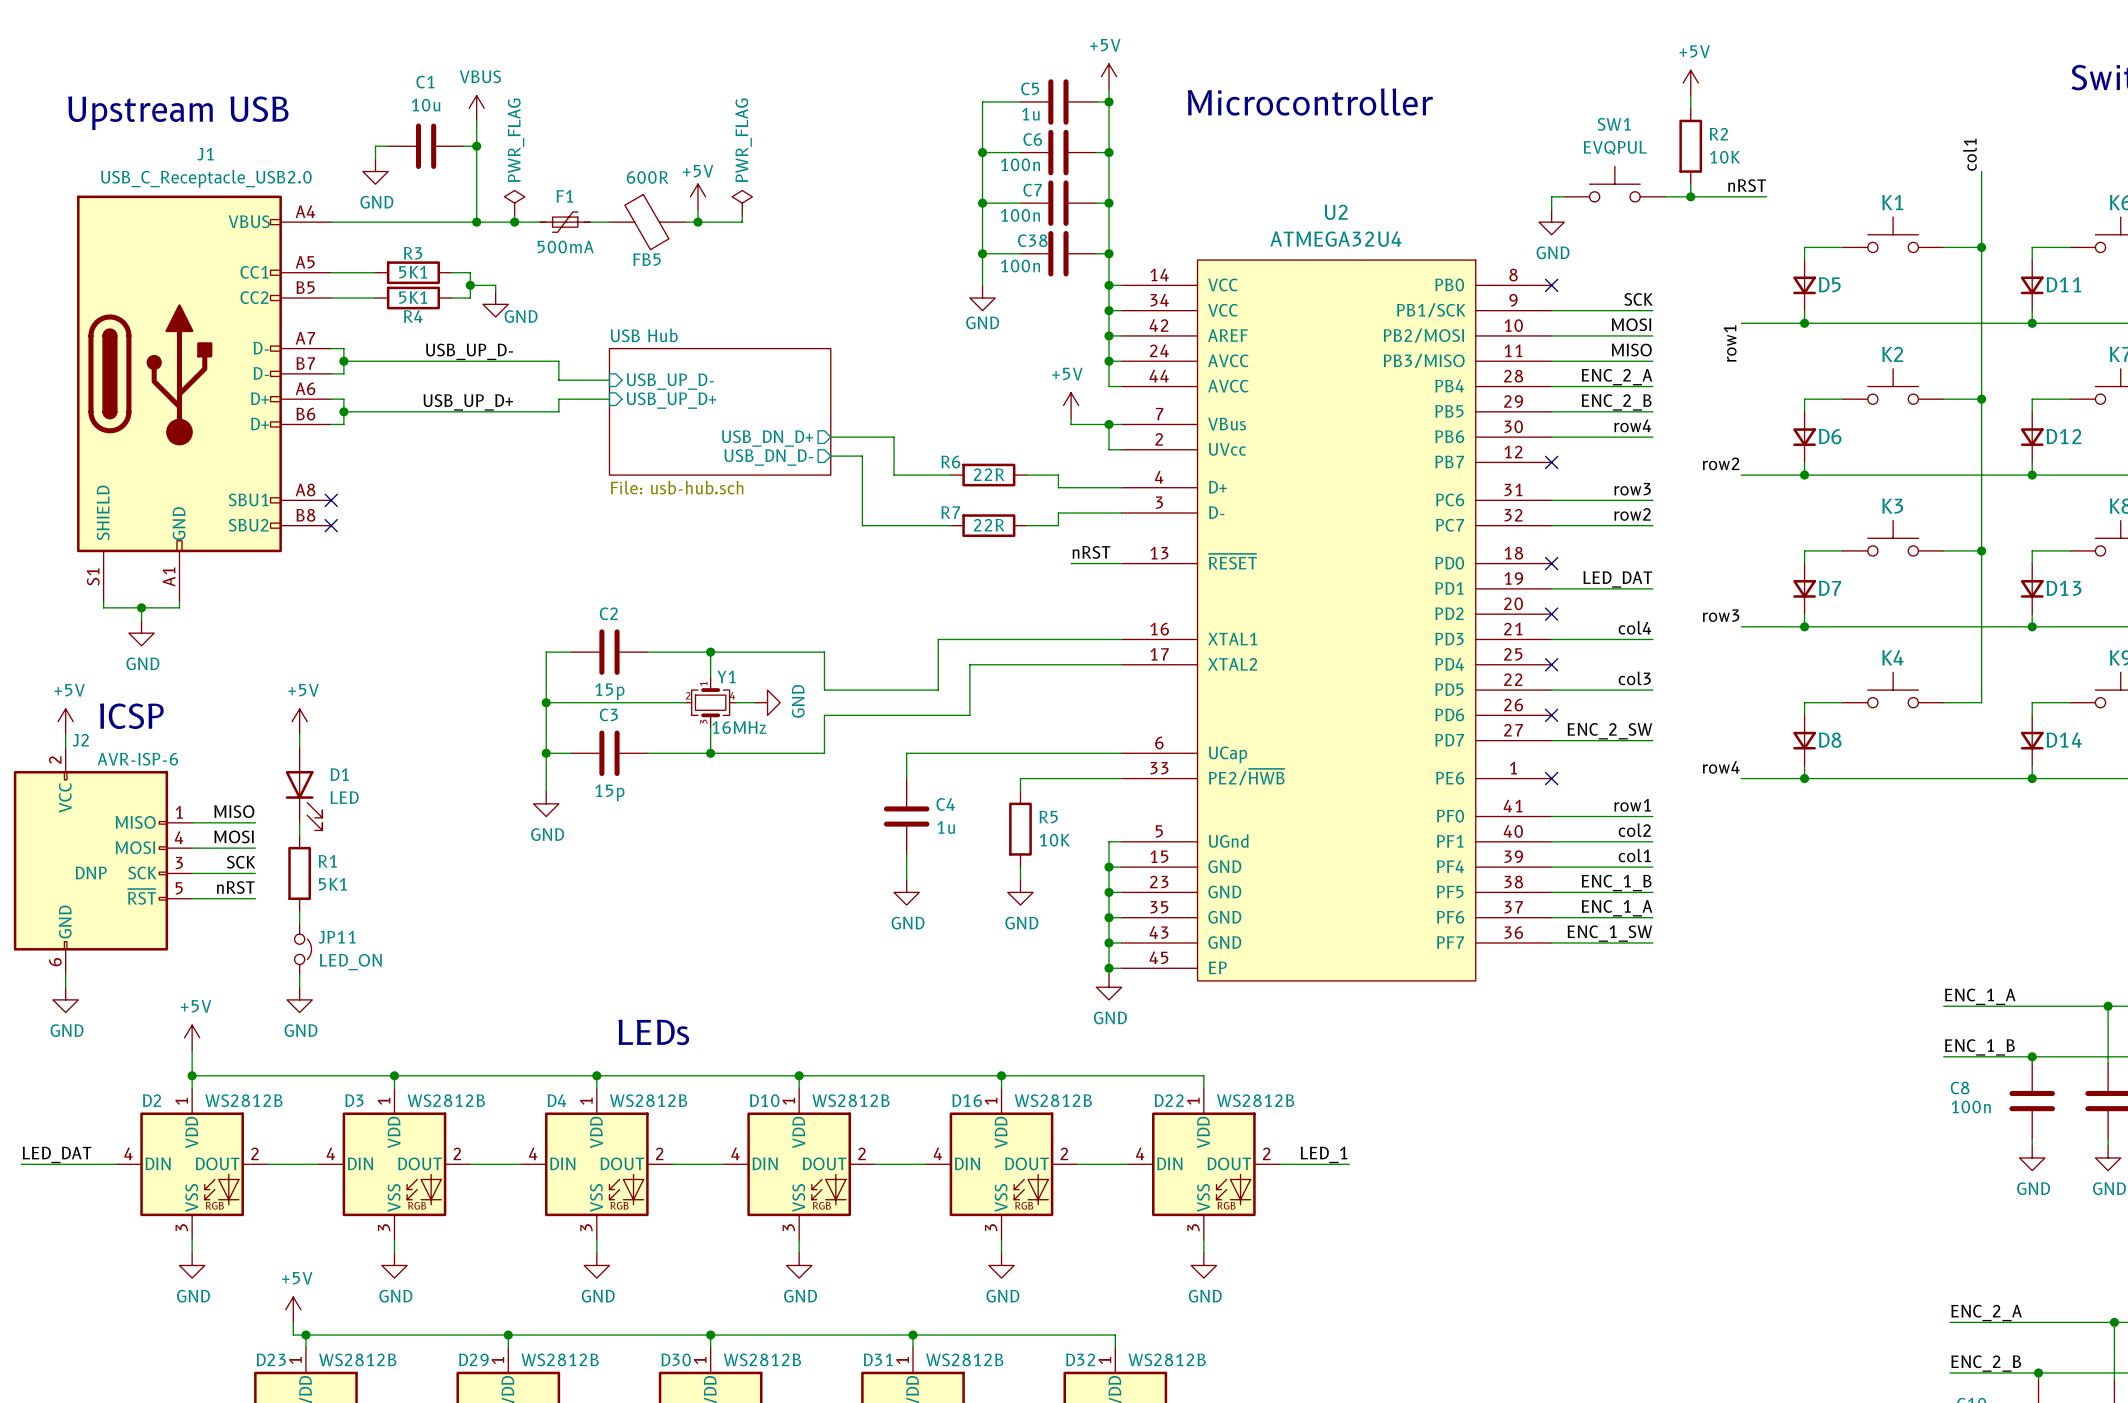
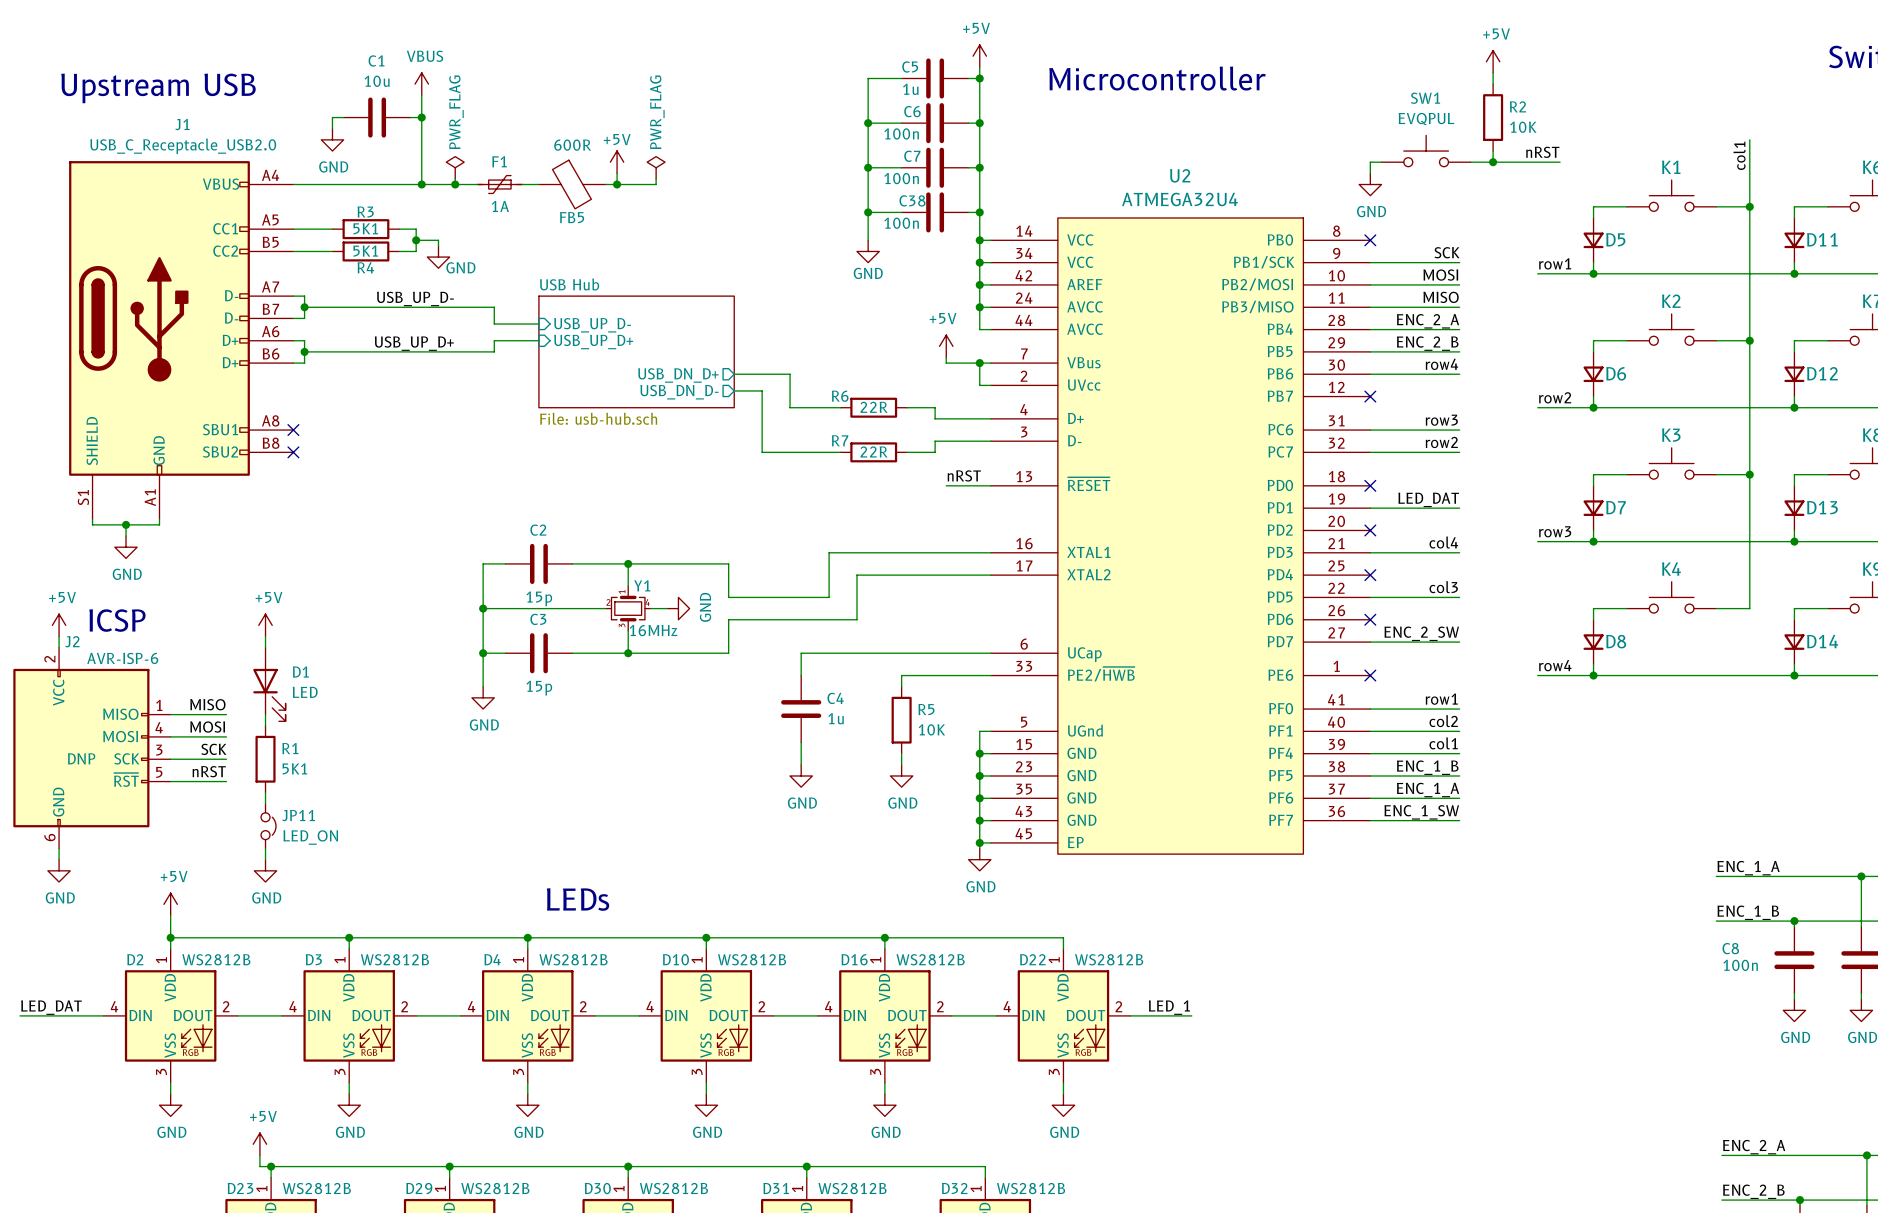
label position: col1 (1969, 154) -> col1 (1739, 155)
F1 value: 500mA (565, 247) -> 1A (500, 206)
label rotation: 0° (1730, 343) -> 90° clockwise (1555, 263)
label position: row2 (1721, 463) -> row2 (1555, 397)
label position: row3 (1721, 615) -> row3 (1555, 531)
label position: row4 (1721, 767) -> row4 (1555, 665)

